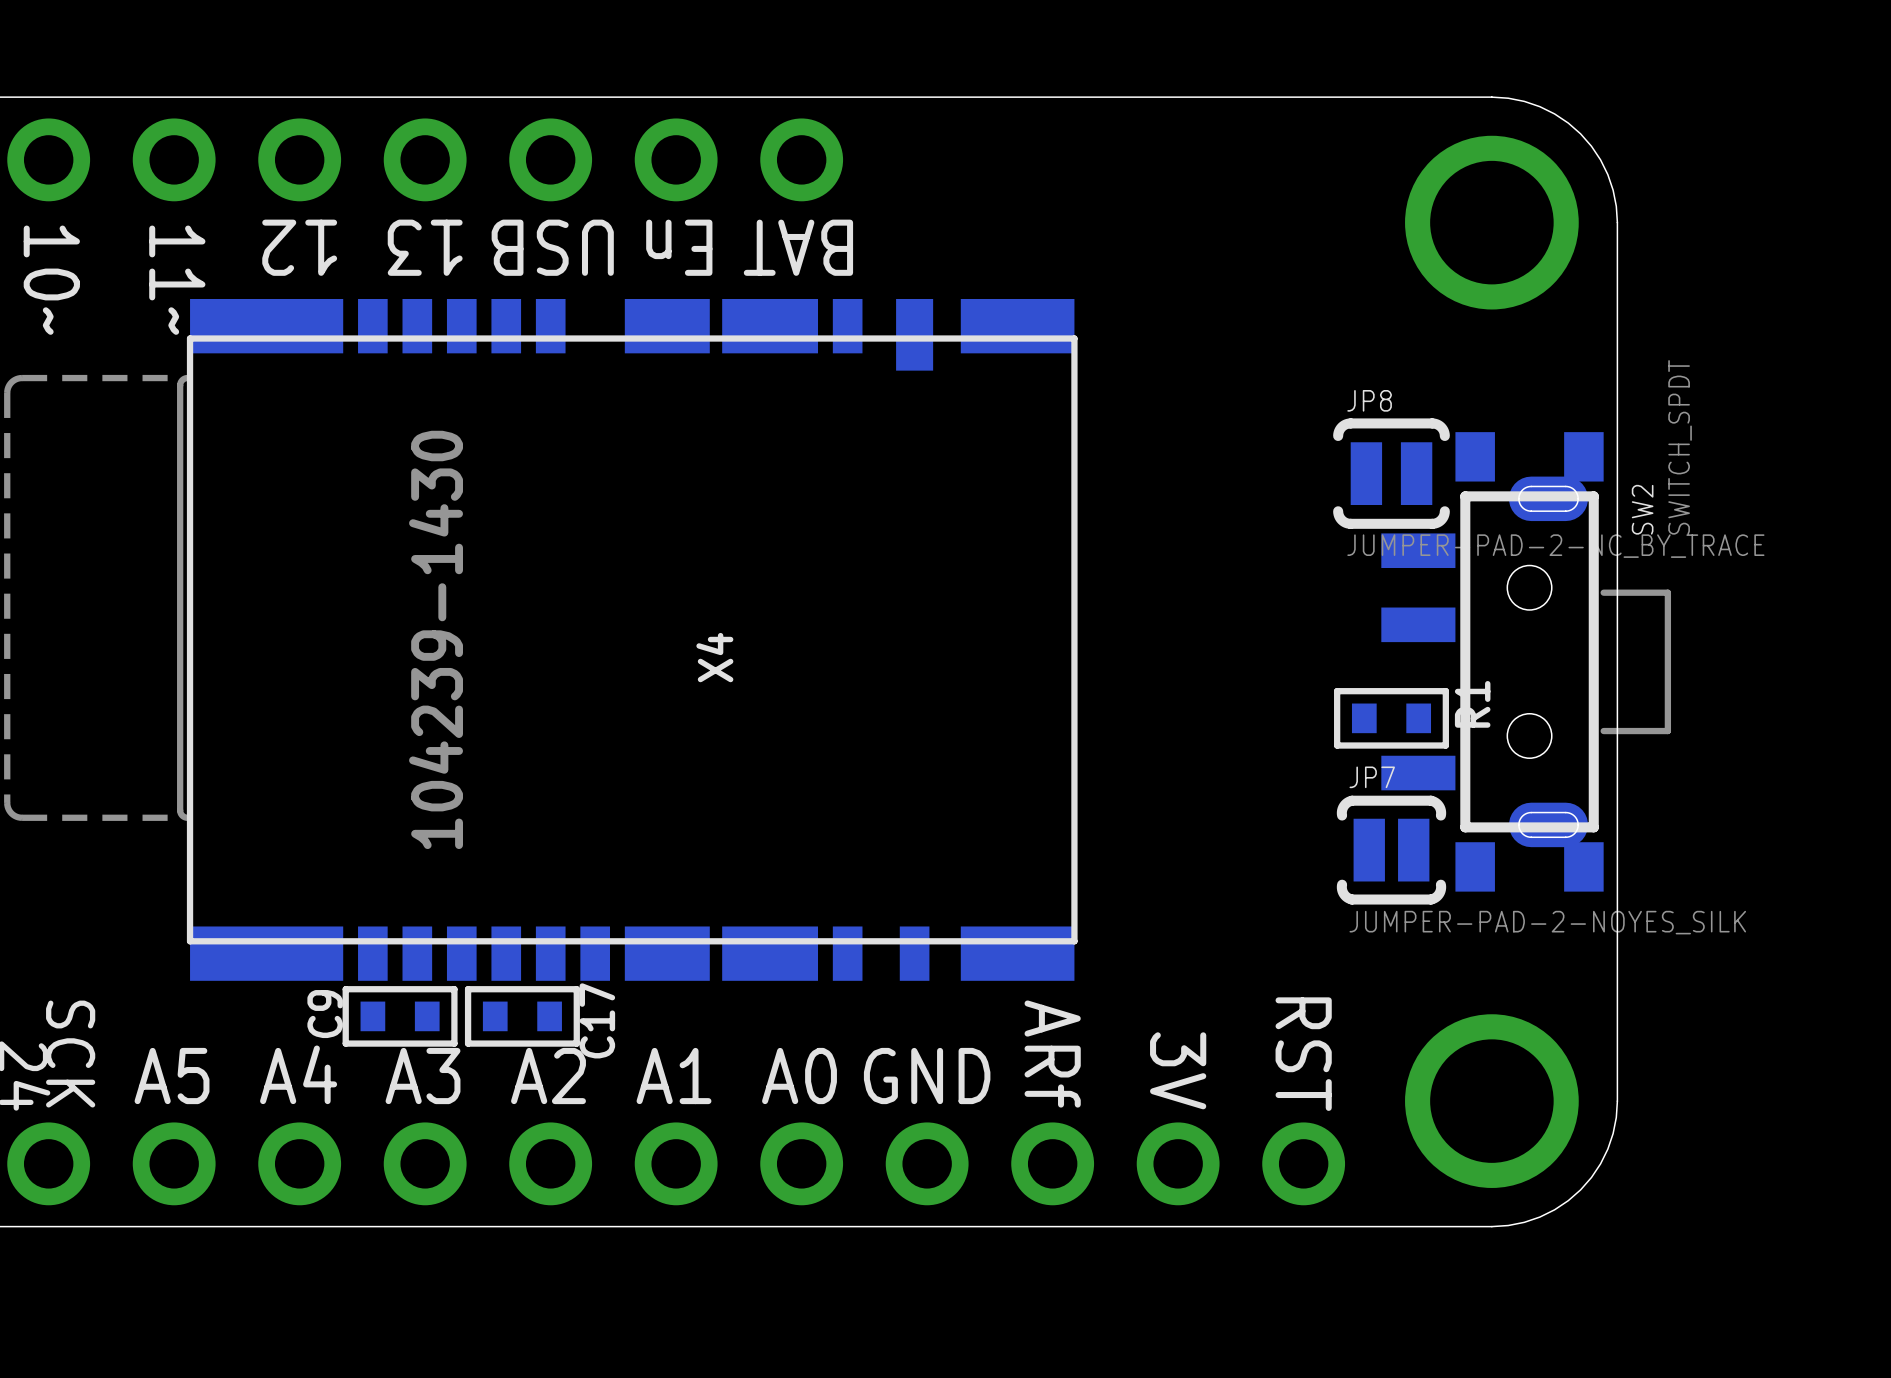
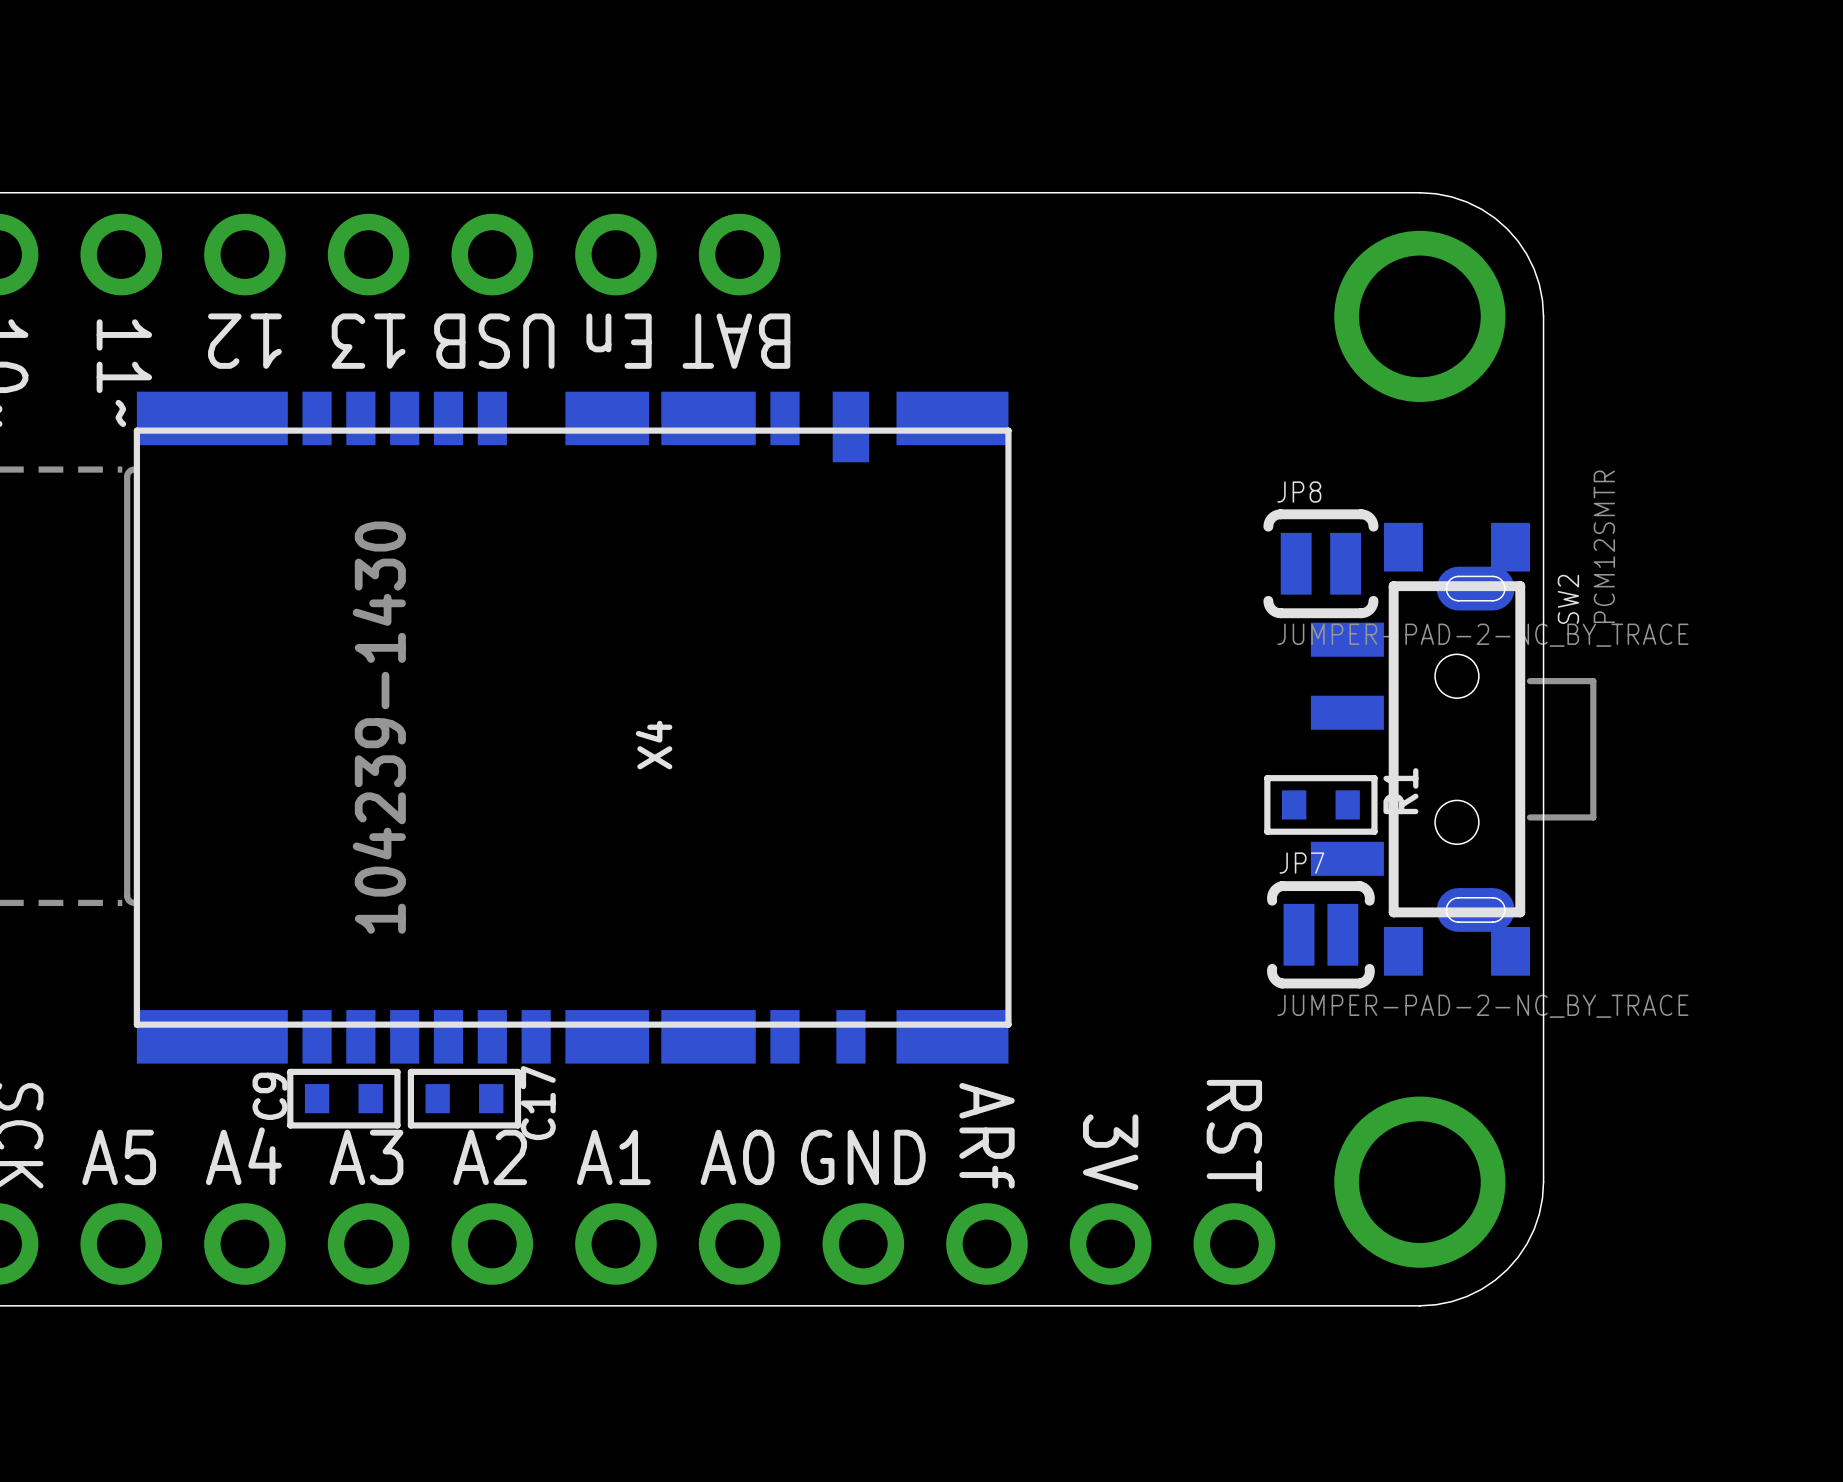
SW2 value: SWITCH_SPDT (1680, 447) -> PCM12SMTR (1604, 546)
JP7 value: JUMPER-PAD-2-NOYES_SILK (1547, 922) -> JUMPER-PAD-2-NC_BY_TRACE (1482, 1006)

